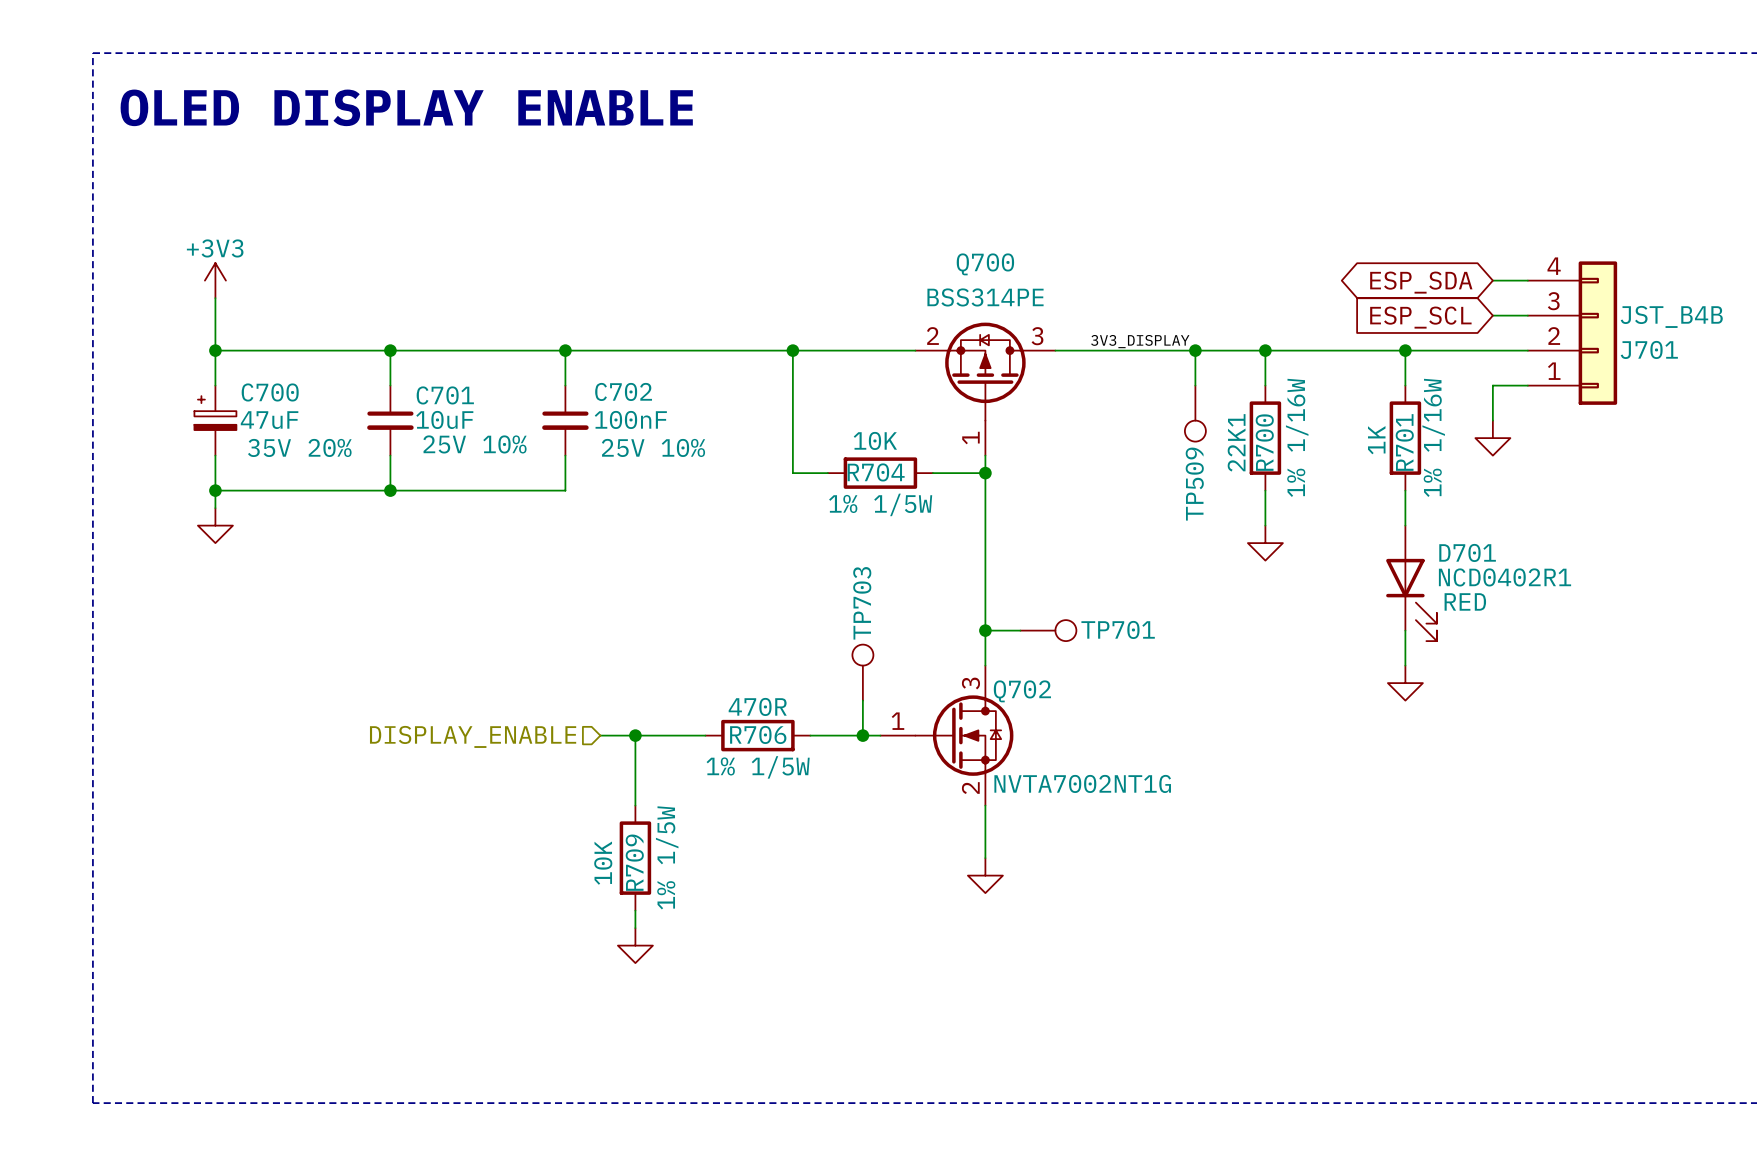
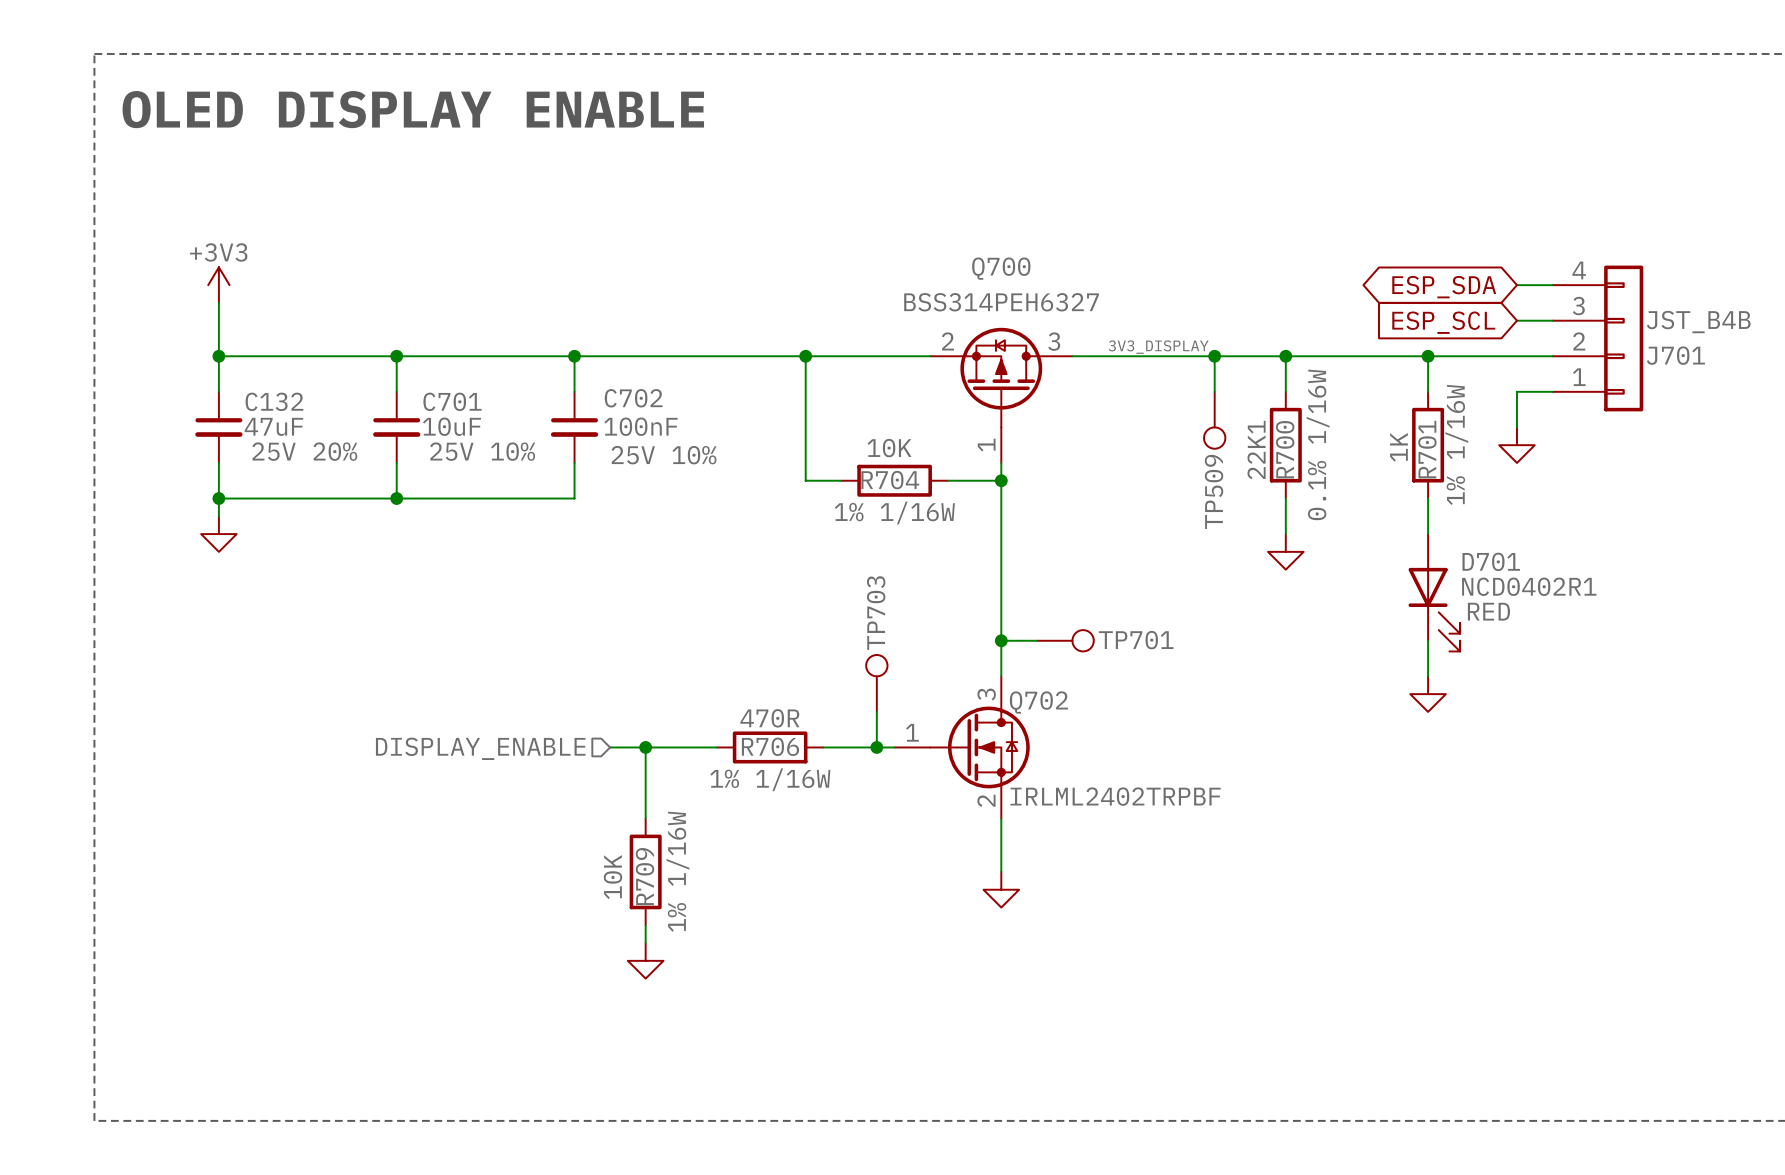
Q700 value: BSS314PE (985, 297) -> BSS314PEH6327 (1001, 302)
C700: 47uF (215, 420) -> none
C132: none -> 47uF (218, 427)
R700 text: 1% 1/16W (1297, 437) -> 0.1% 1/16W (1318, 444)
R704 text: 1% 1/5W (880, 504) -> 1% 1/16W (894, 513)
R706 text: 1% 1/5W (758, 767) -> 1% 1/16W (770, 779)
Q702 value: NVTA7002NT1G (1082, 783) -> IRLML2402TRPBF (1115, 796)
R709 text: 1% 1/5W (667, 857) -> 1% 1/16W (677, 871)

